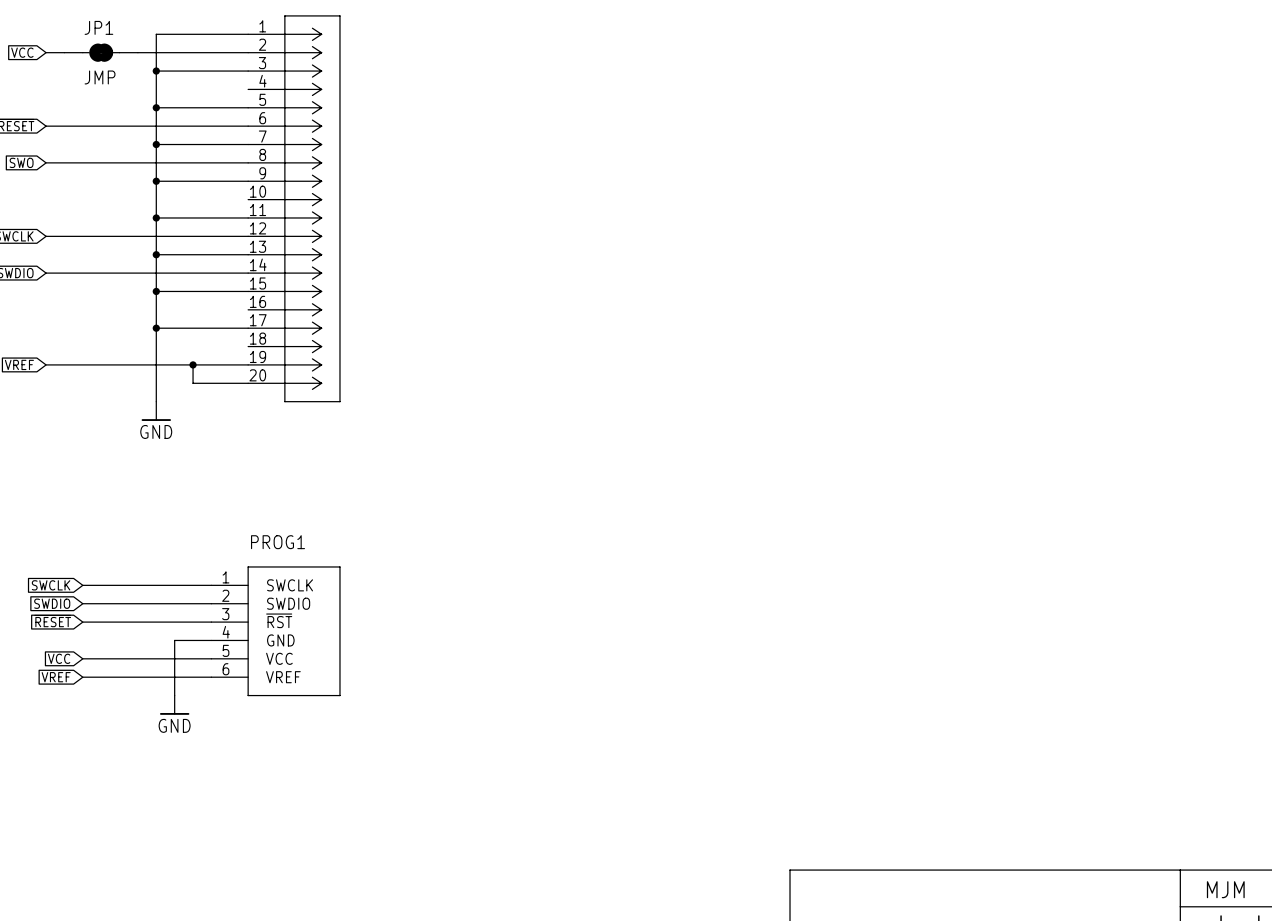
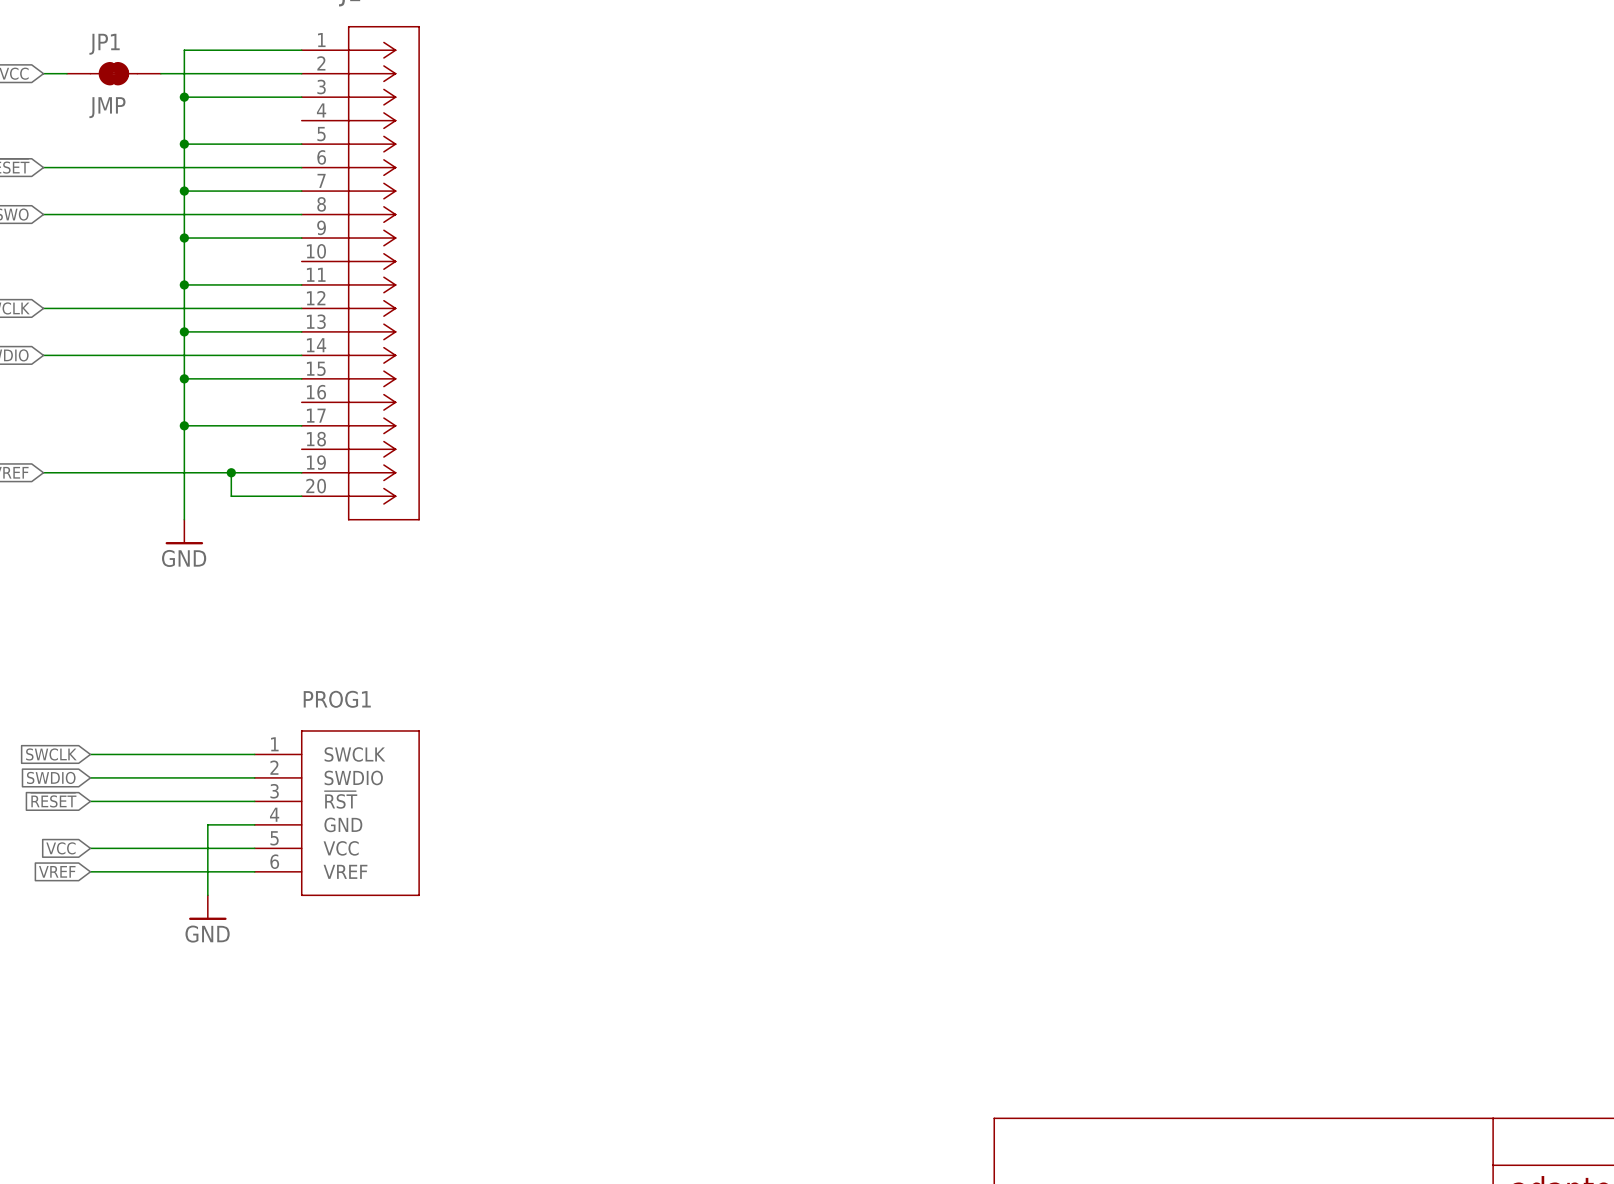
text: MJM (1225, 889) -> none

